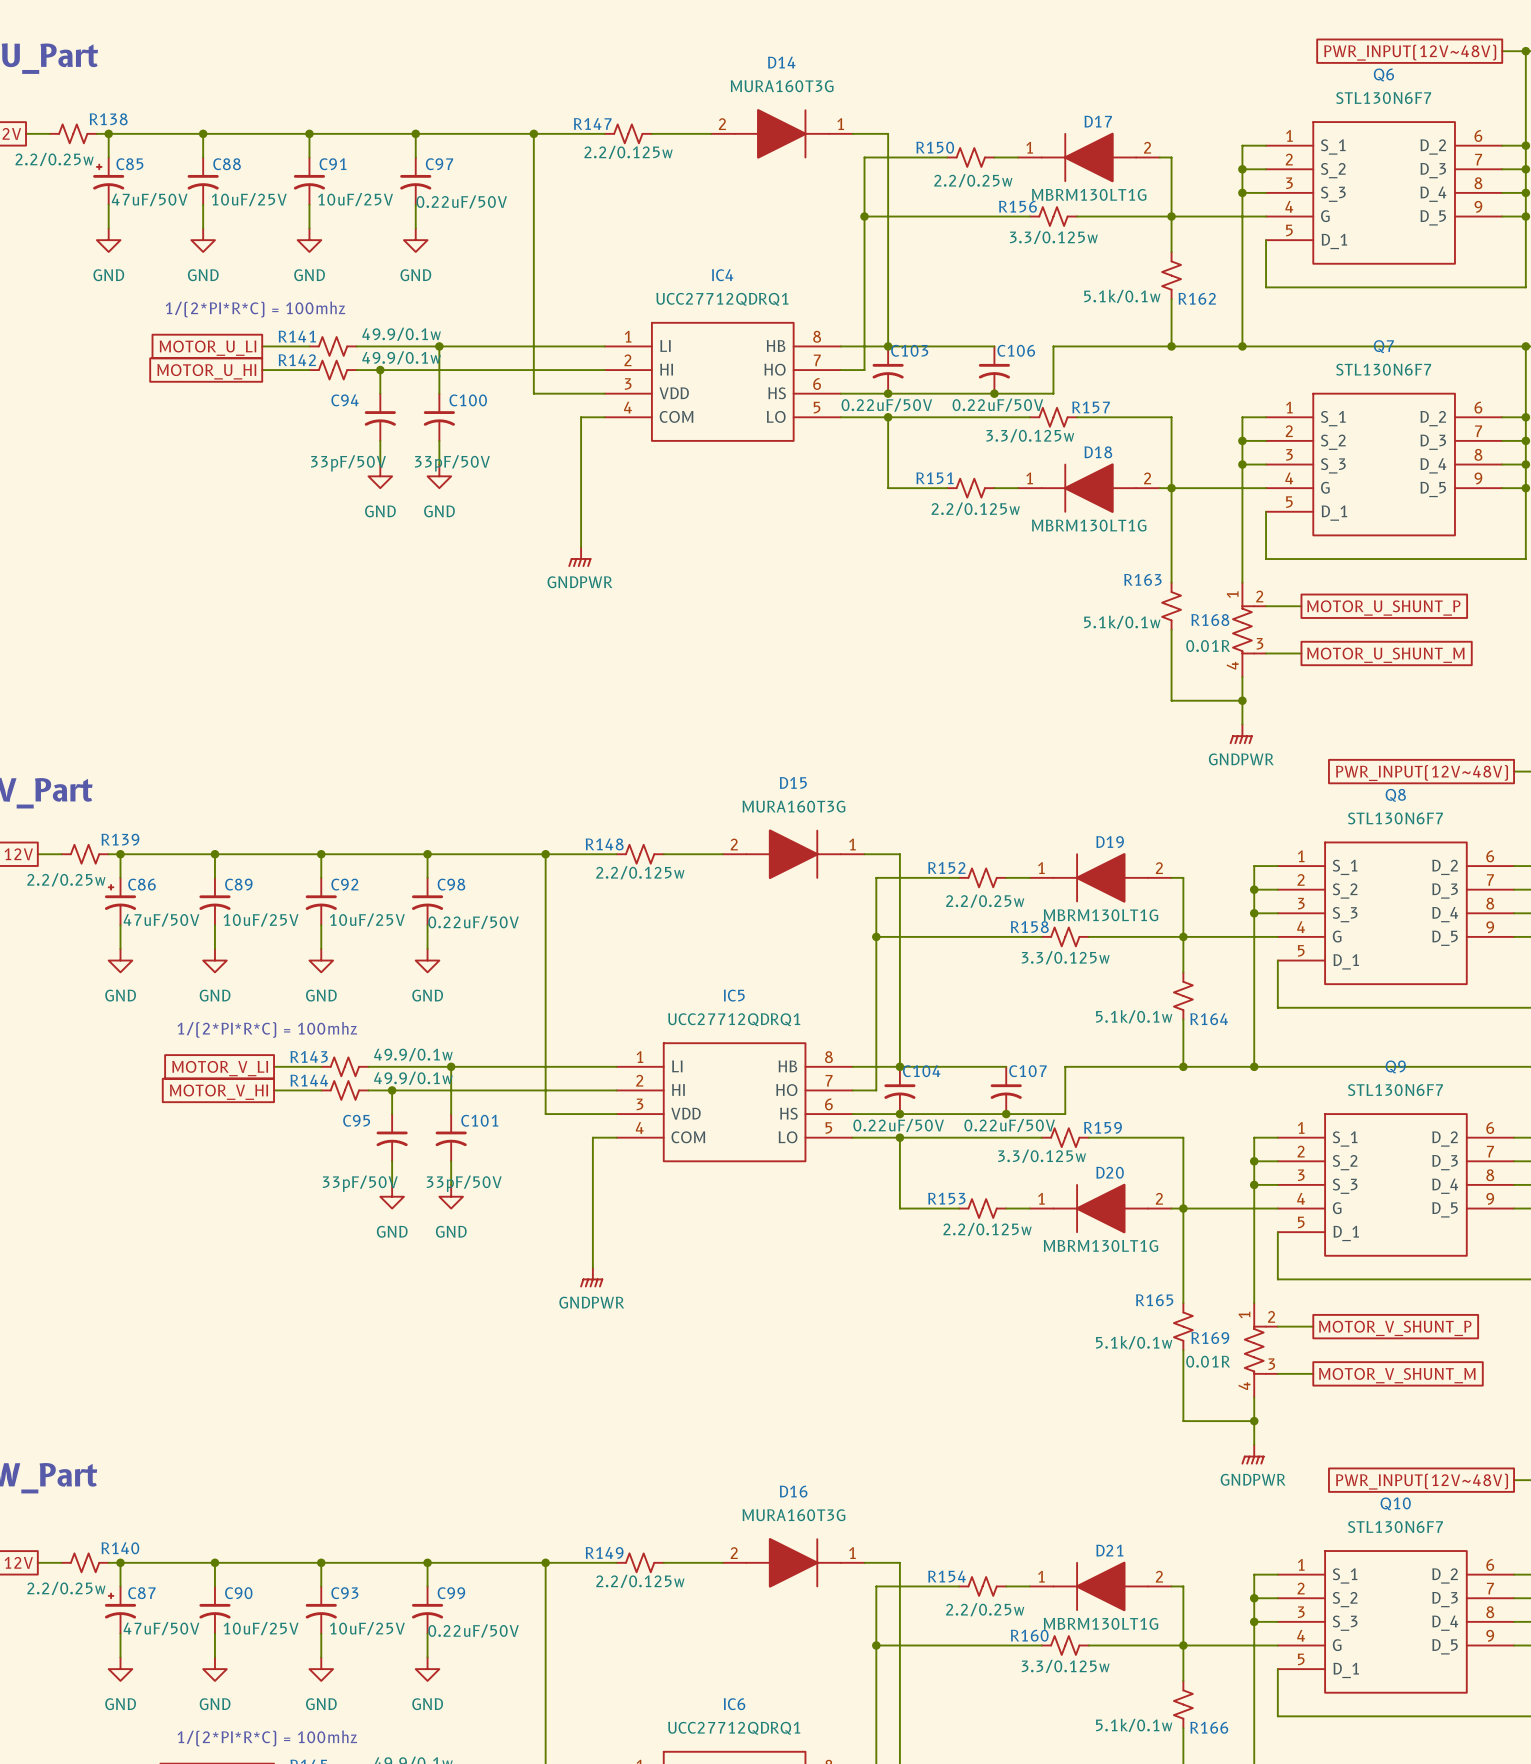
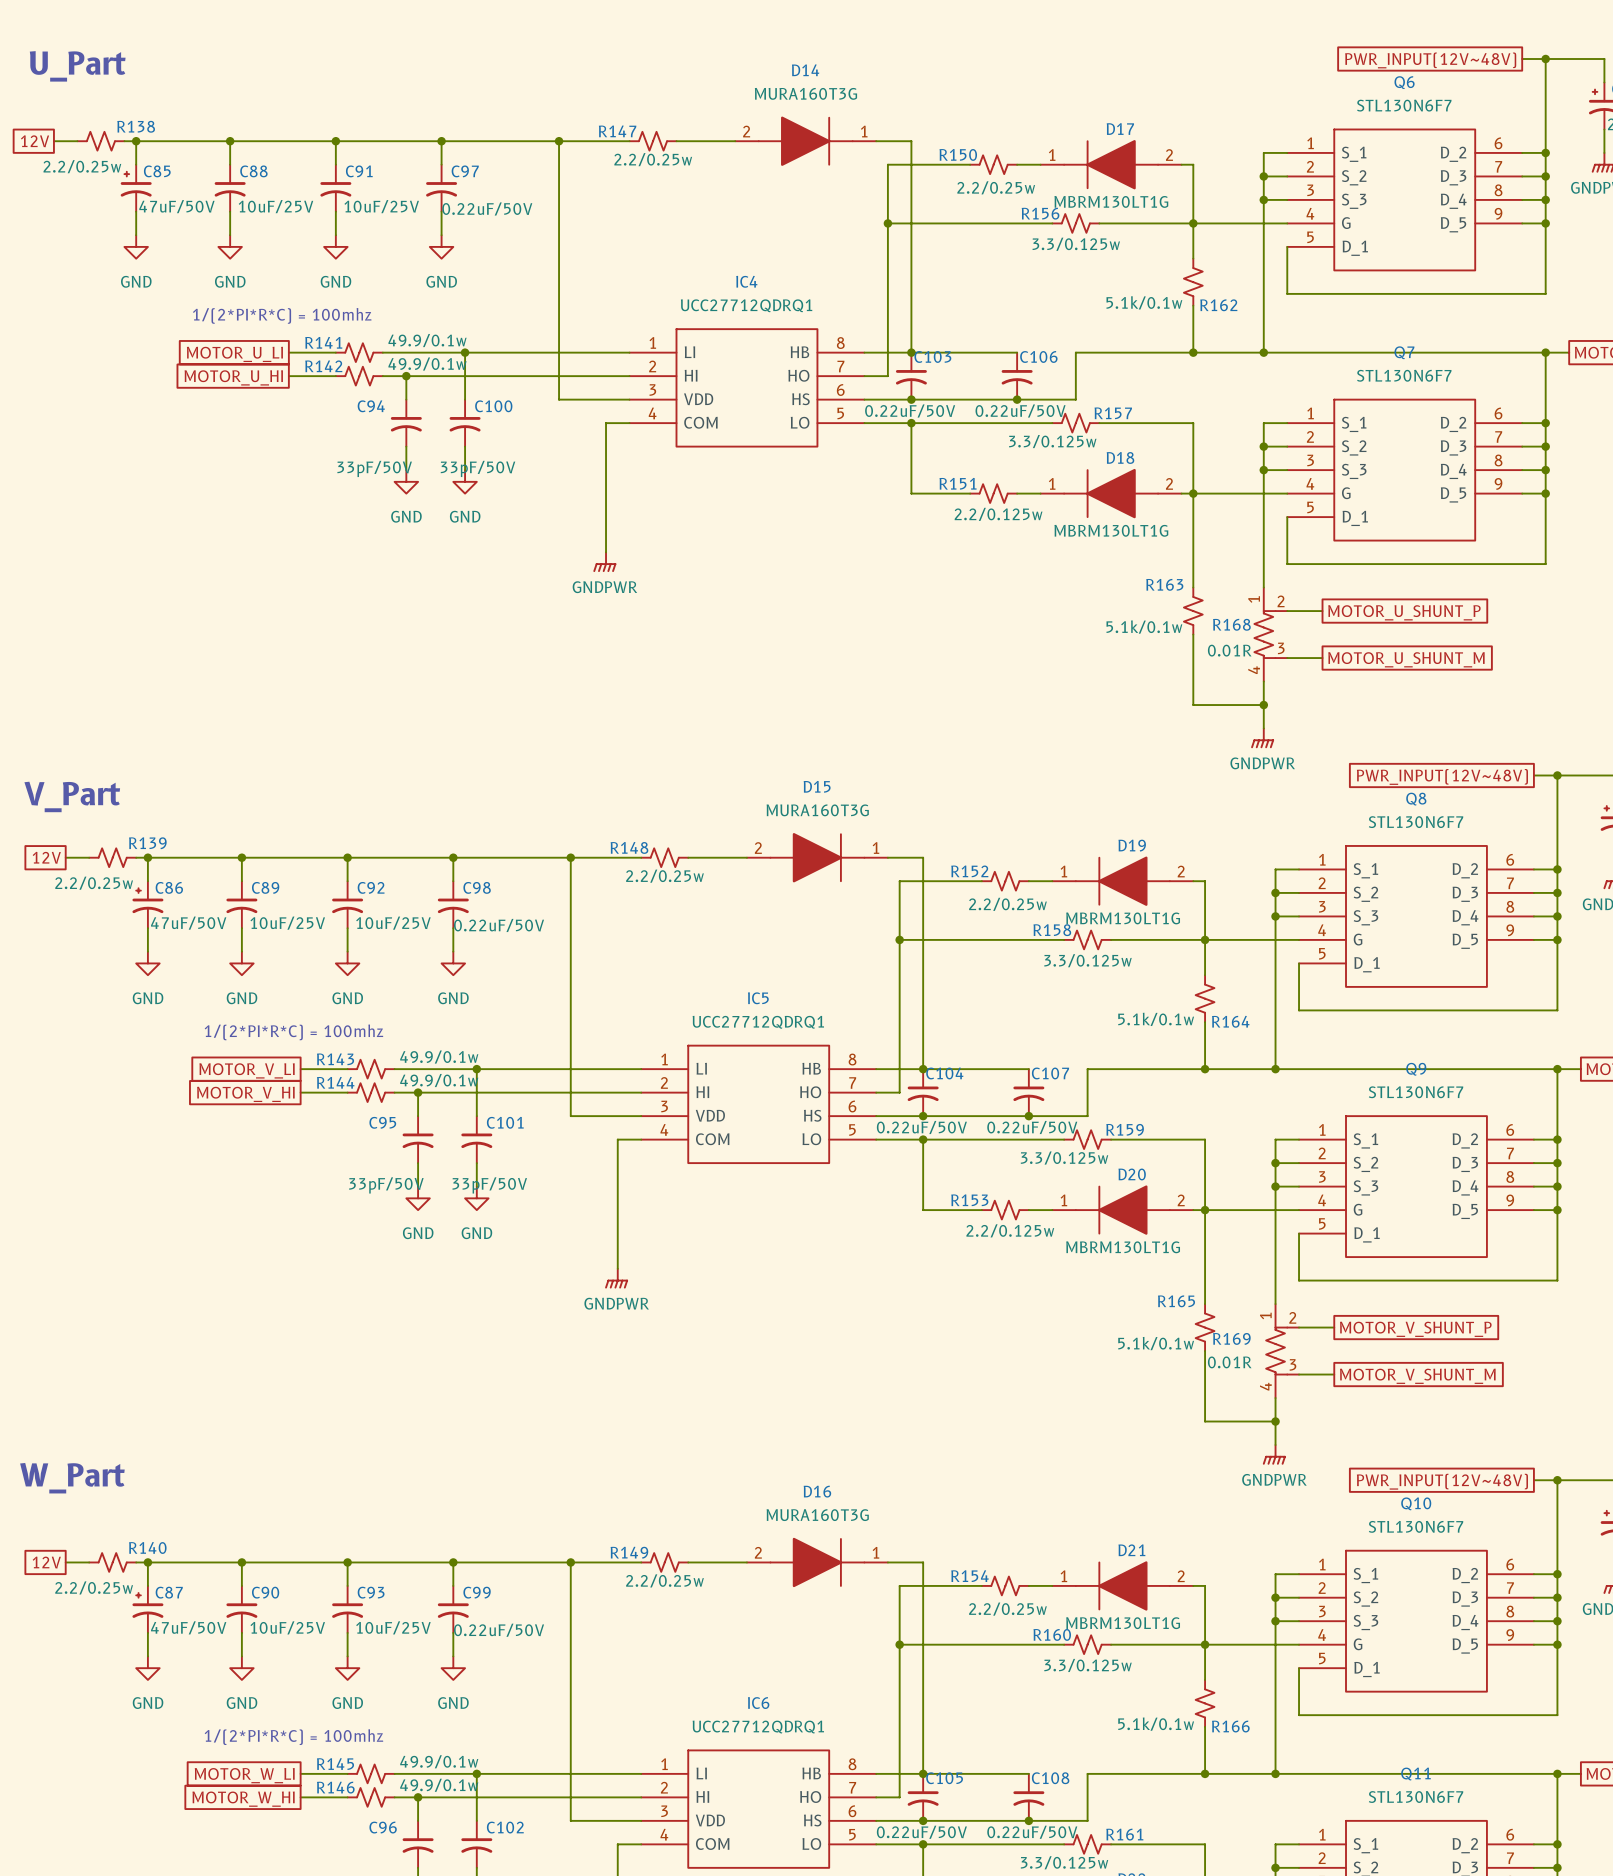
R147 value: 2.2/0.125w (628, 152) -> 2.2/0.25w (653, 159)
R148 value: 2.2/0.125w (640, 872) -> 2.2/0.25w (664, 876)
R149 value: 2.2/0.125w (640, 1581) -> 2.2/0.25w (664, 1580)

